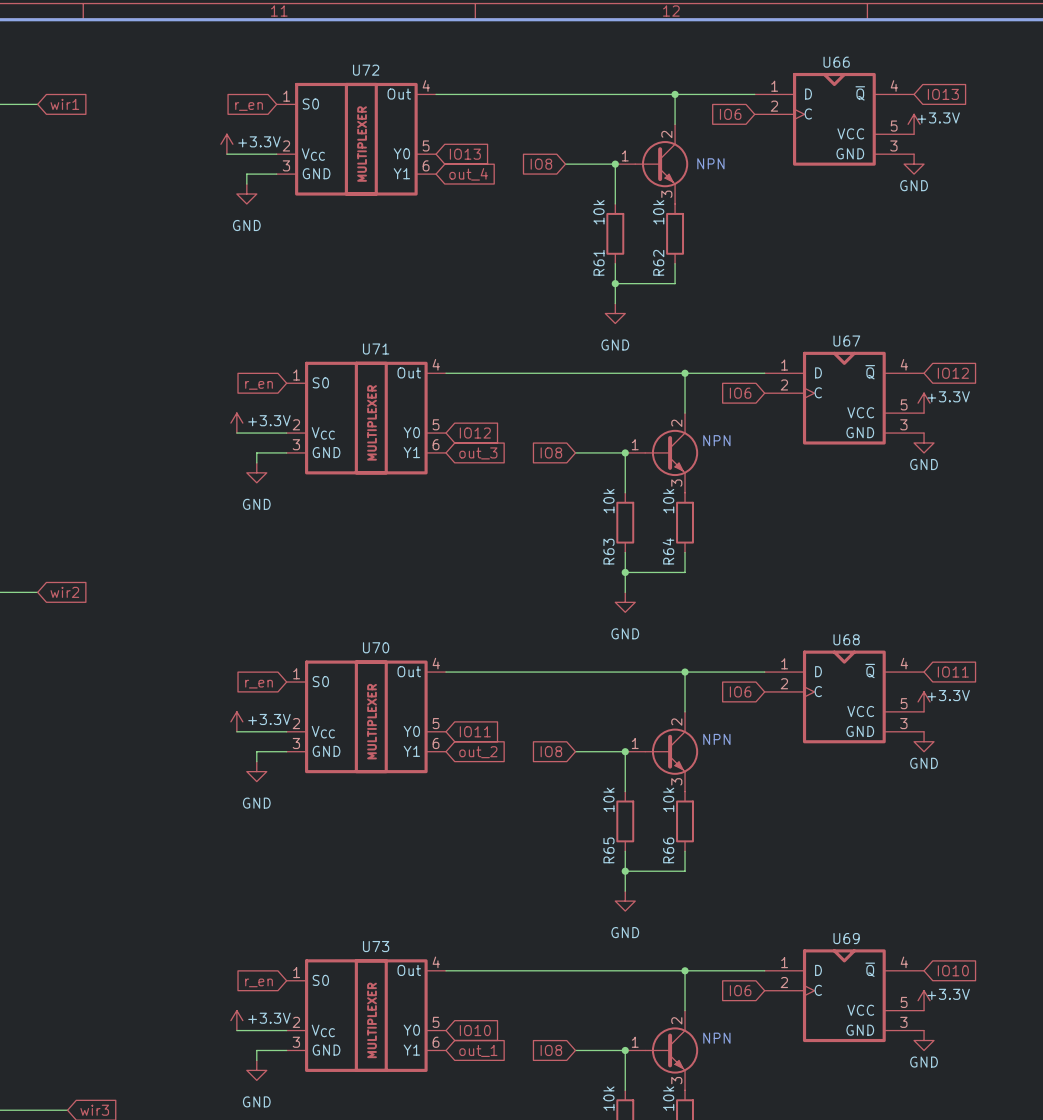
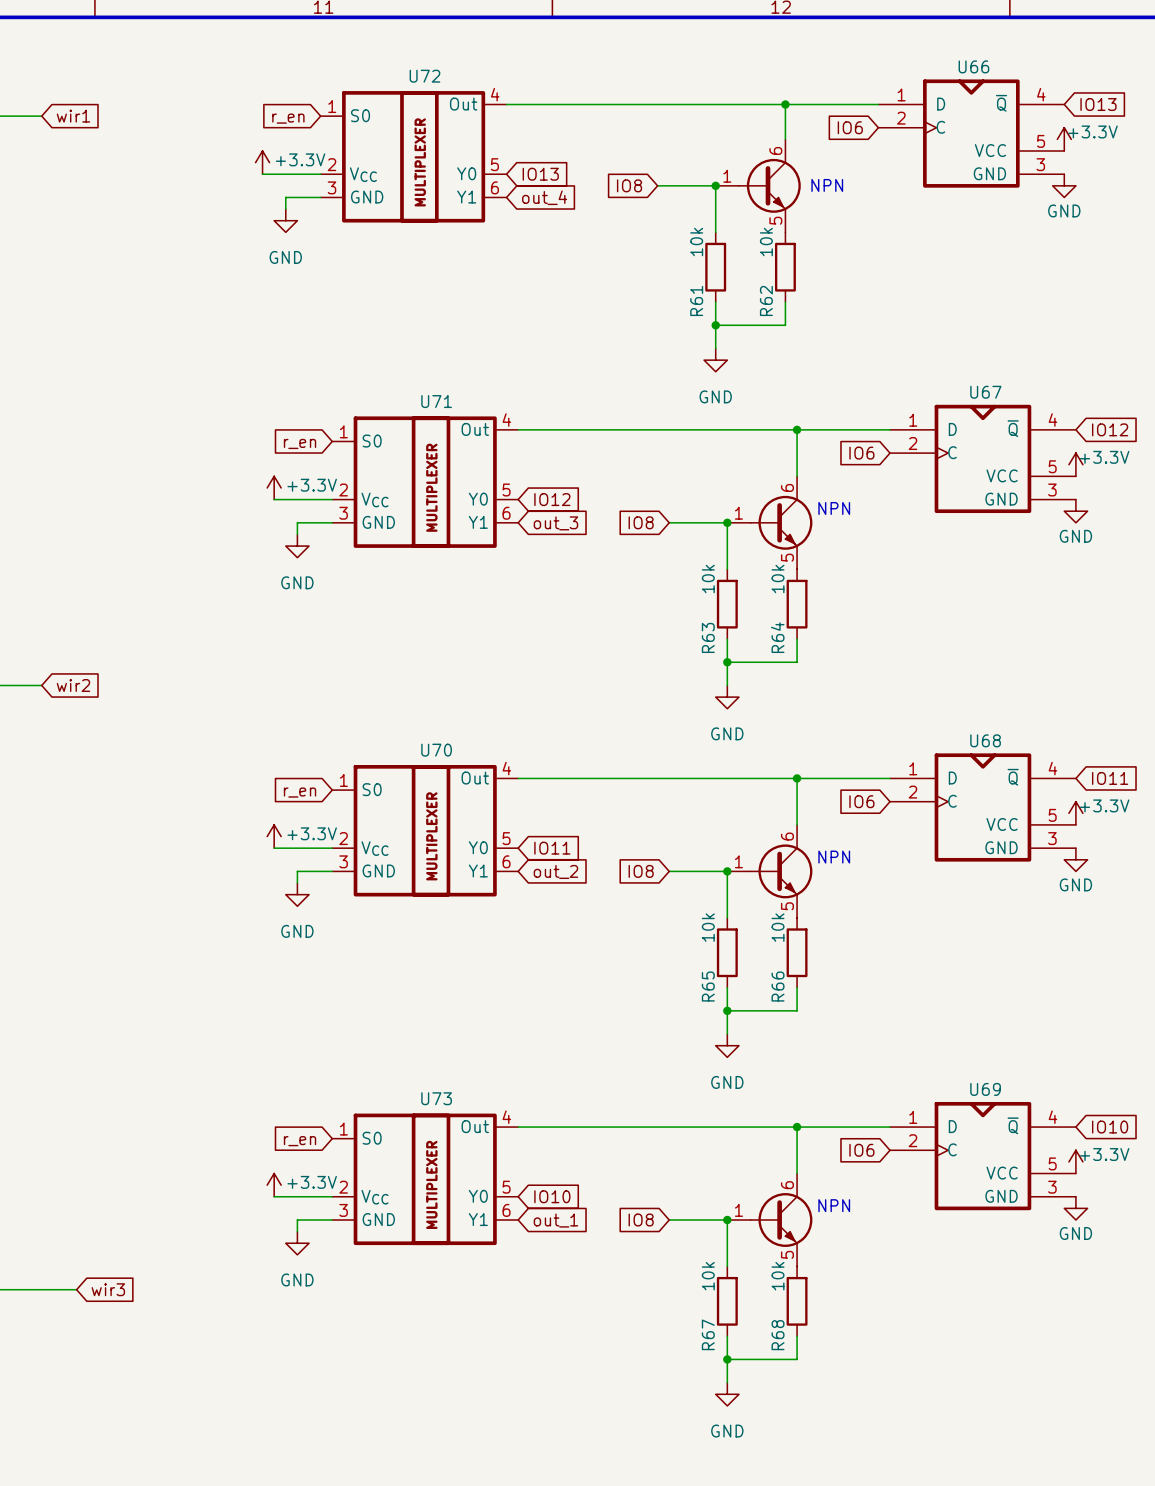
part pin number: 2 (666, 134) -> 6 (775, 150)
part pin number: 3 (666, 194) -> 5 (775, 220)
part pin number: 2 (676, 423) -> 6 (787, 487)
part pin number: 3 (676, 483) -> 5 (787, 557)
part pin number: 2 (676, 722) -> 6 (787, 836)
part pin number: 3 (676, 781) -> 5 (787, 906)
part pin number: 2 (676, 1020) -> 6 (787, 1185)
part pin number: 3 (676, 1080) -> 5 (787, 1254)

